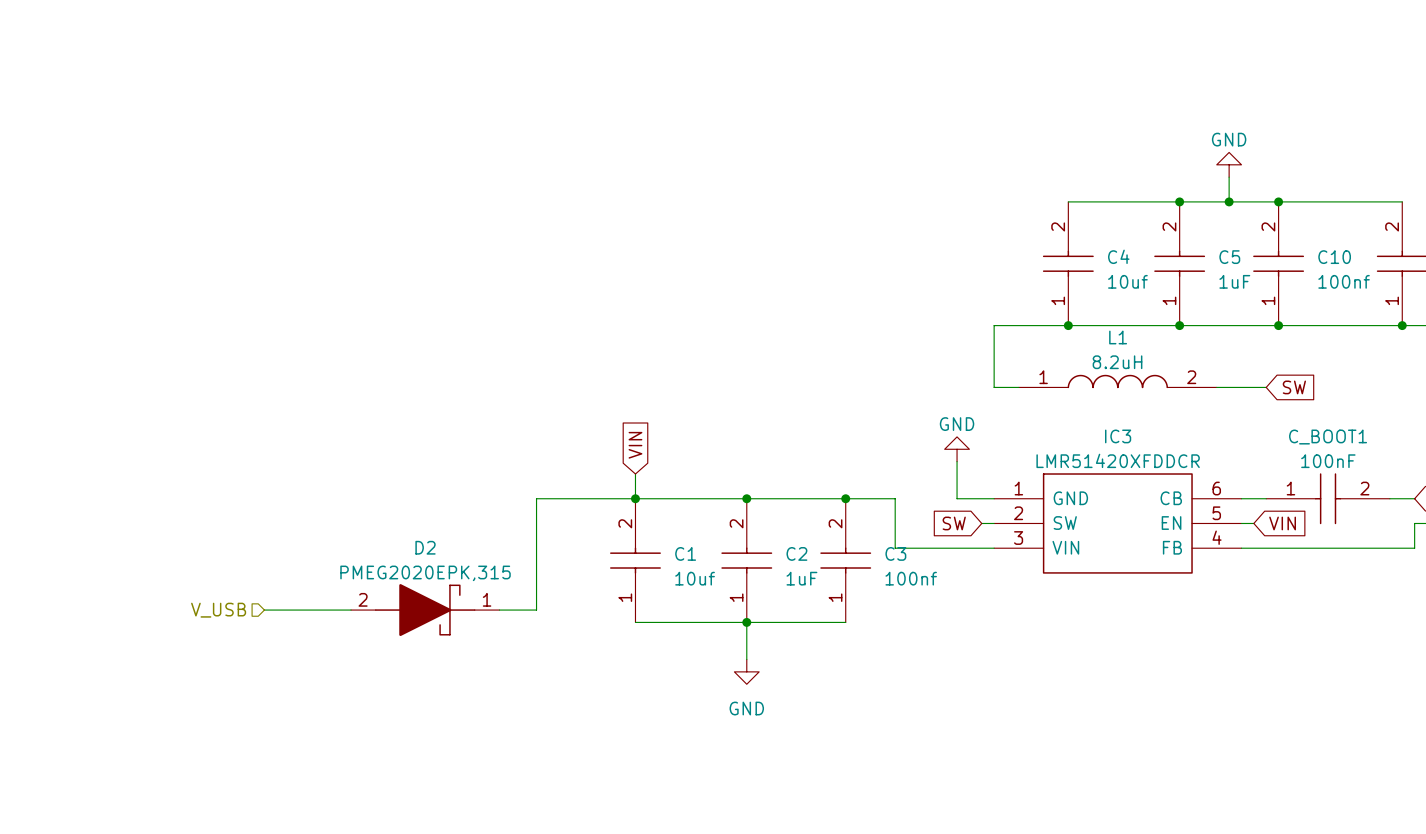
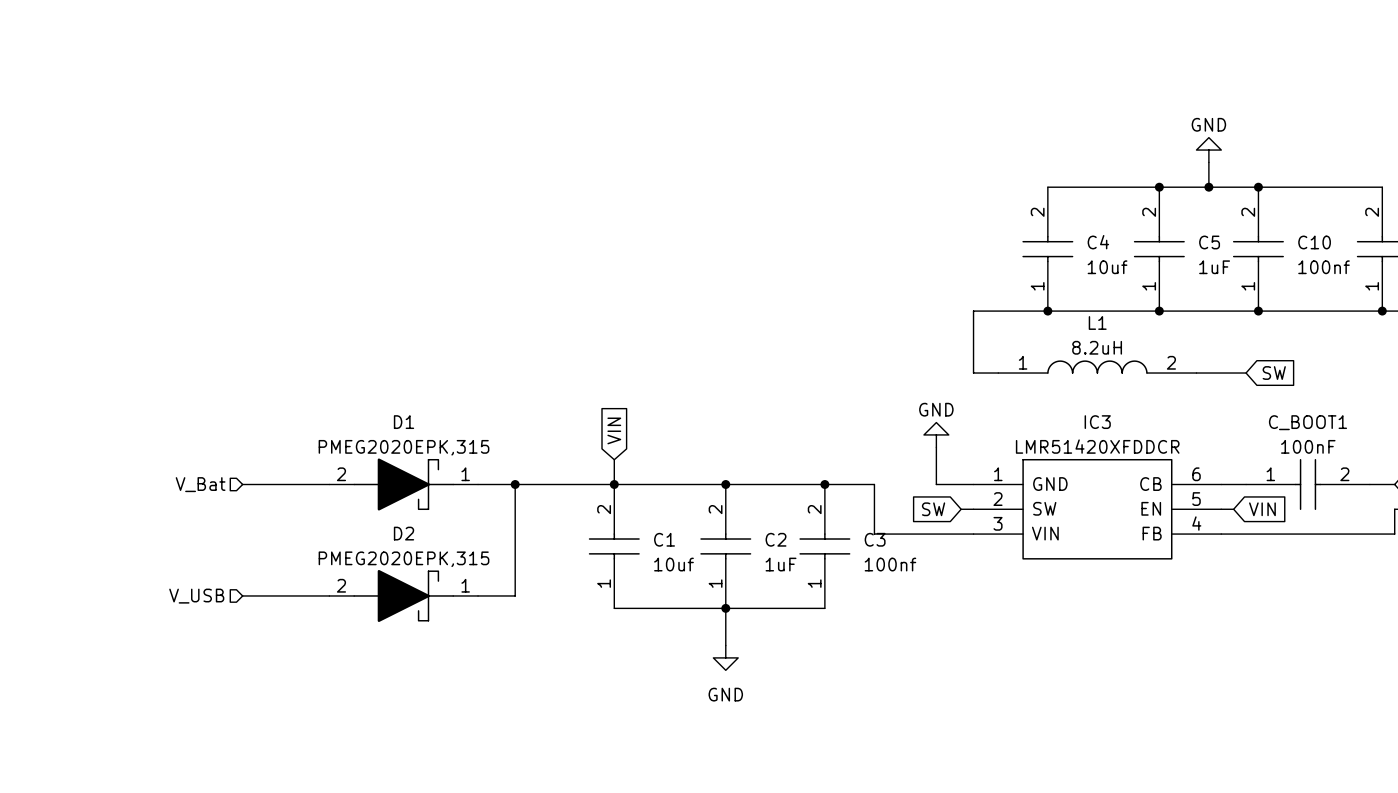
hierarchical label: none -> V_Bat (200, 484)
wire: none -> (242, 484) (329, 484)
D1: none -> PMEG2020EPK,315 (403, 484)
wire: none -> (478, 484) (515, 484)
junction: none -> (515, 484)

